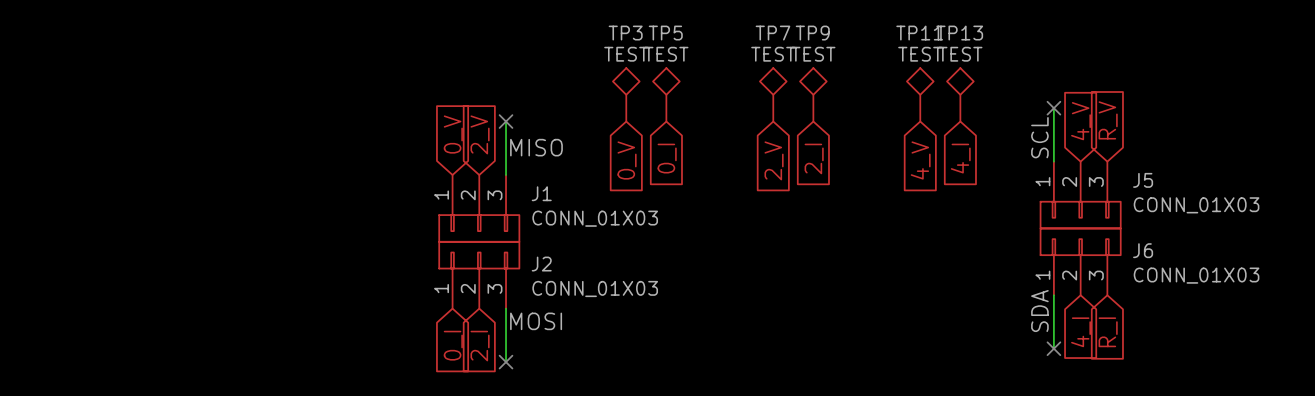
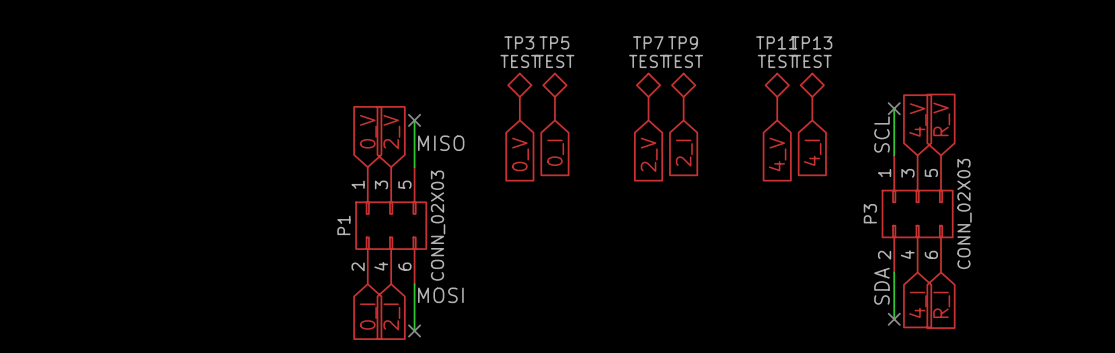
J5: CONN_01X03 (1080, 195) -> none
J1: CONN_01X03 (479, 208) -> none
P3: none -> CONN_02X03 (917, 213)
P1: none -> CONN_02X03 (391, 225)
J6: CONN_01X03 (1080, 261) -> none
J2: CONN_01X03 (479, 275) -> none

